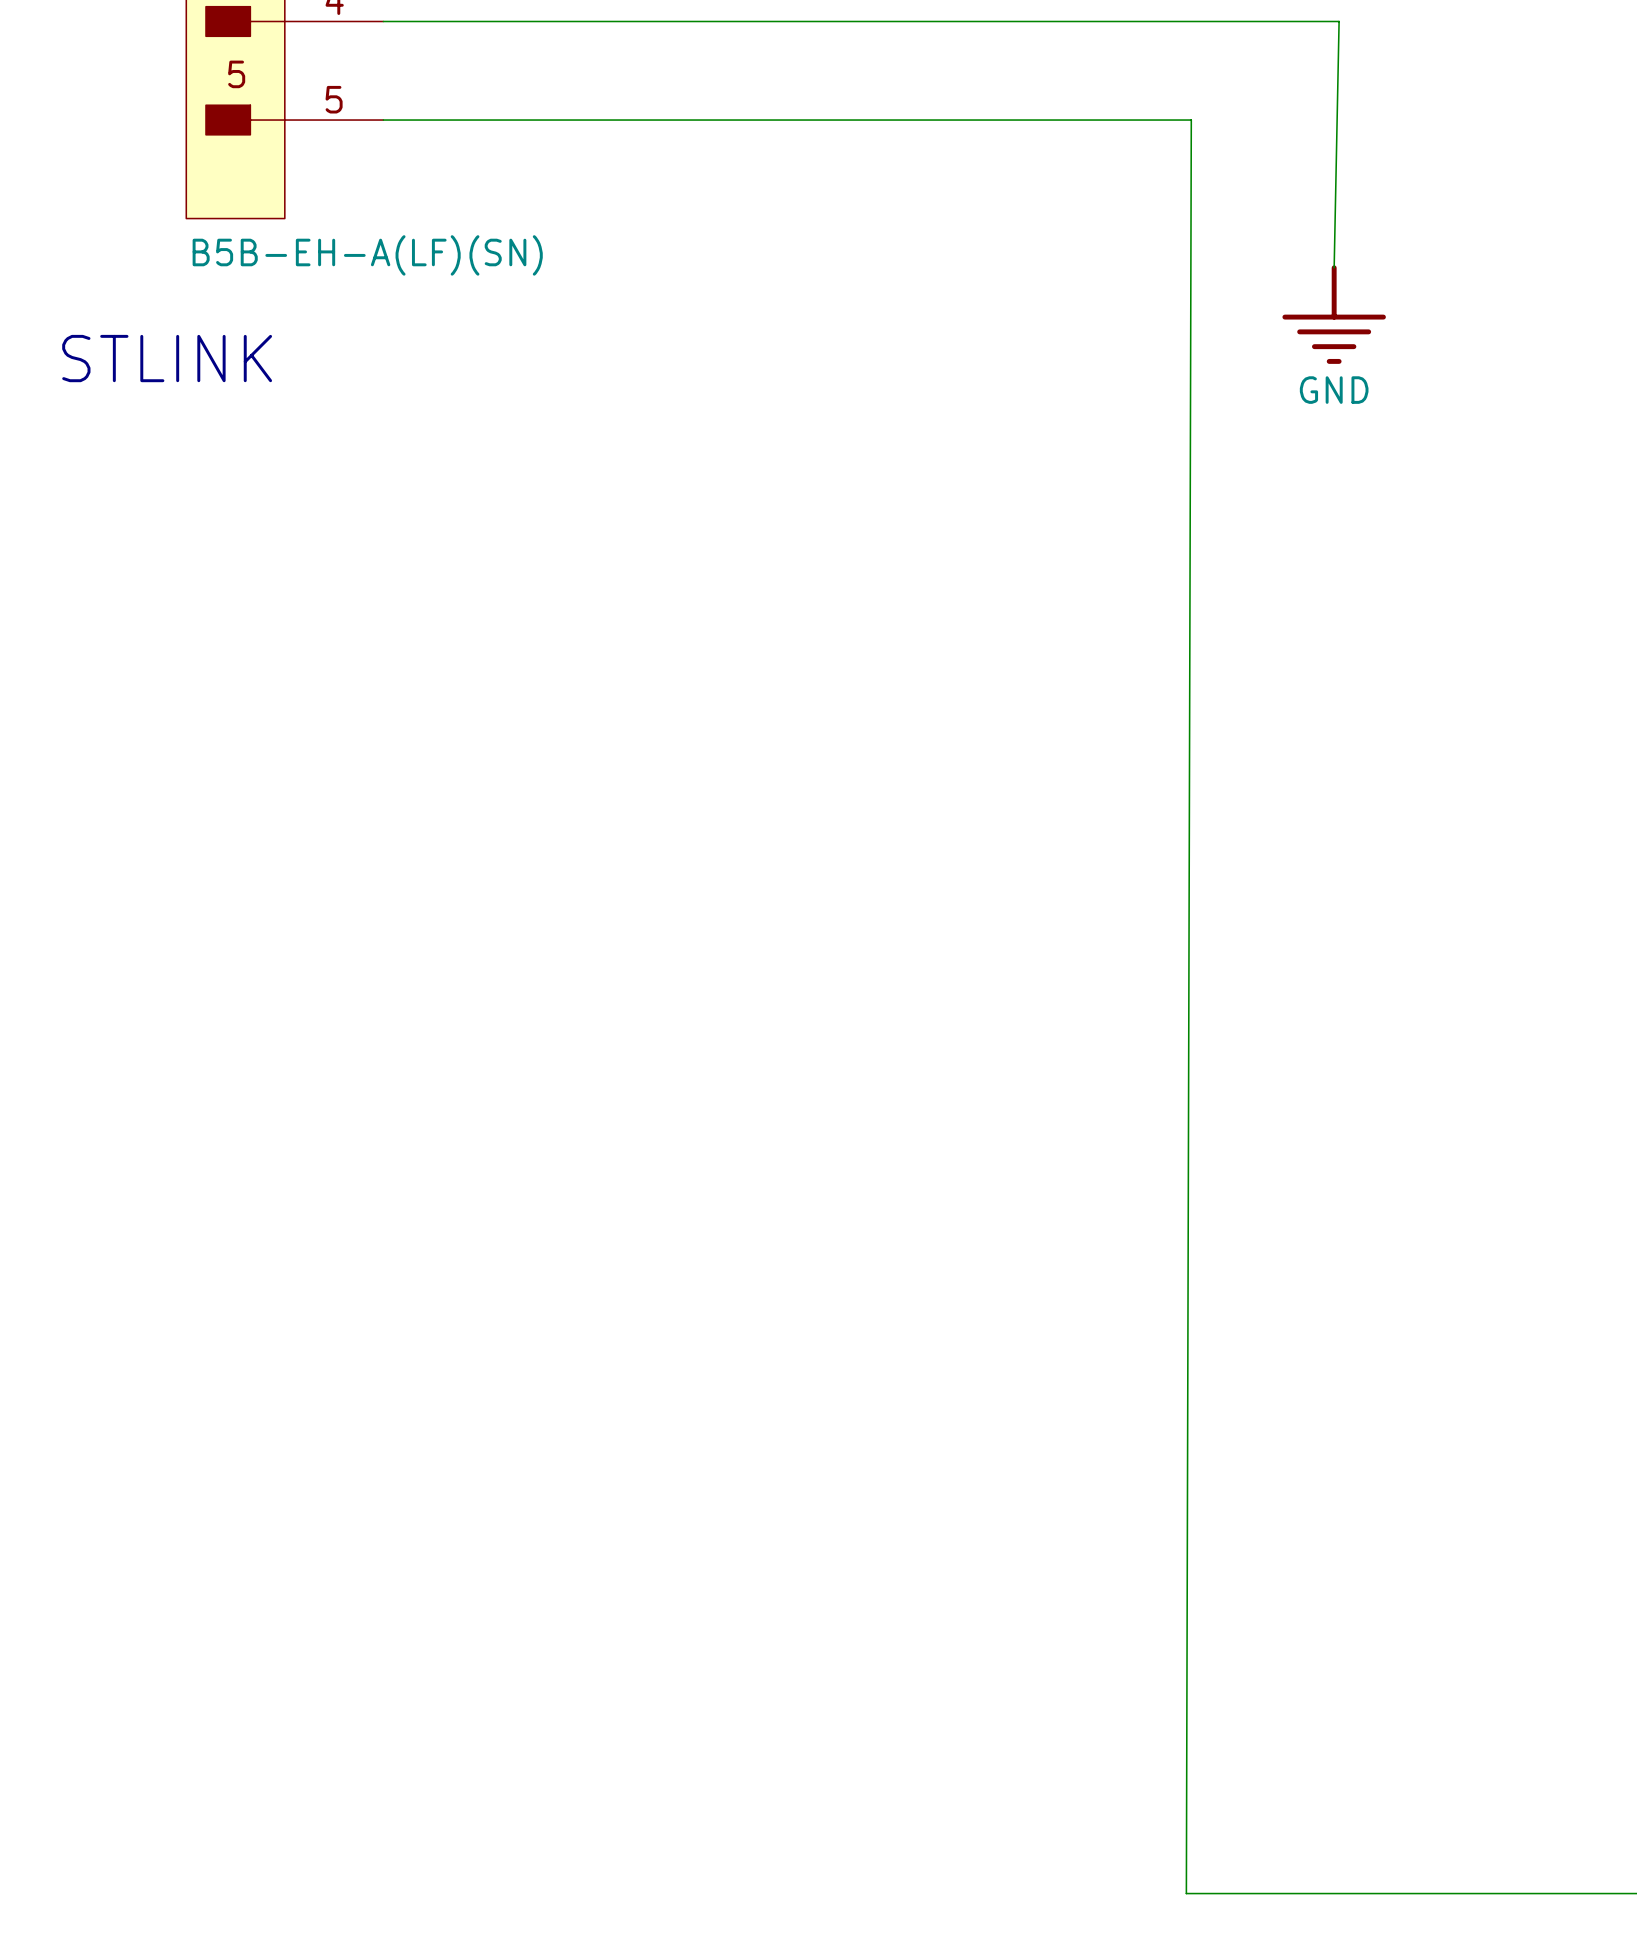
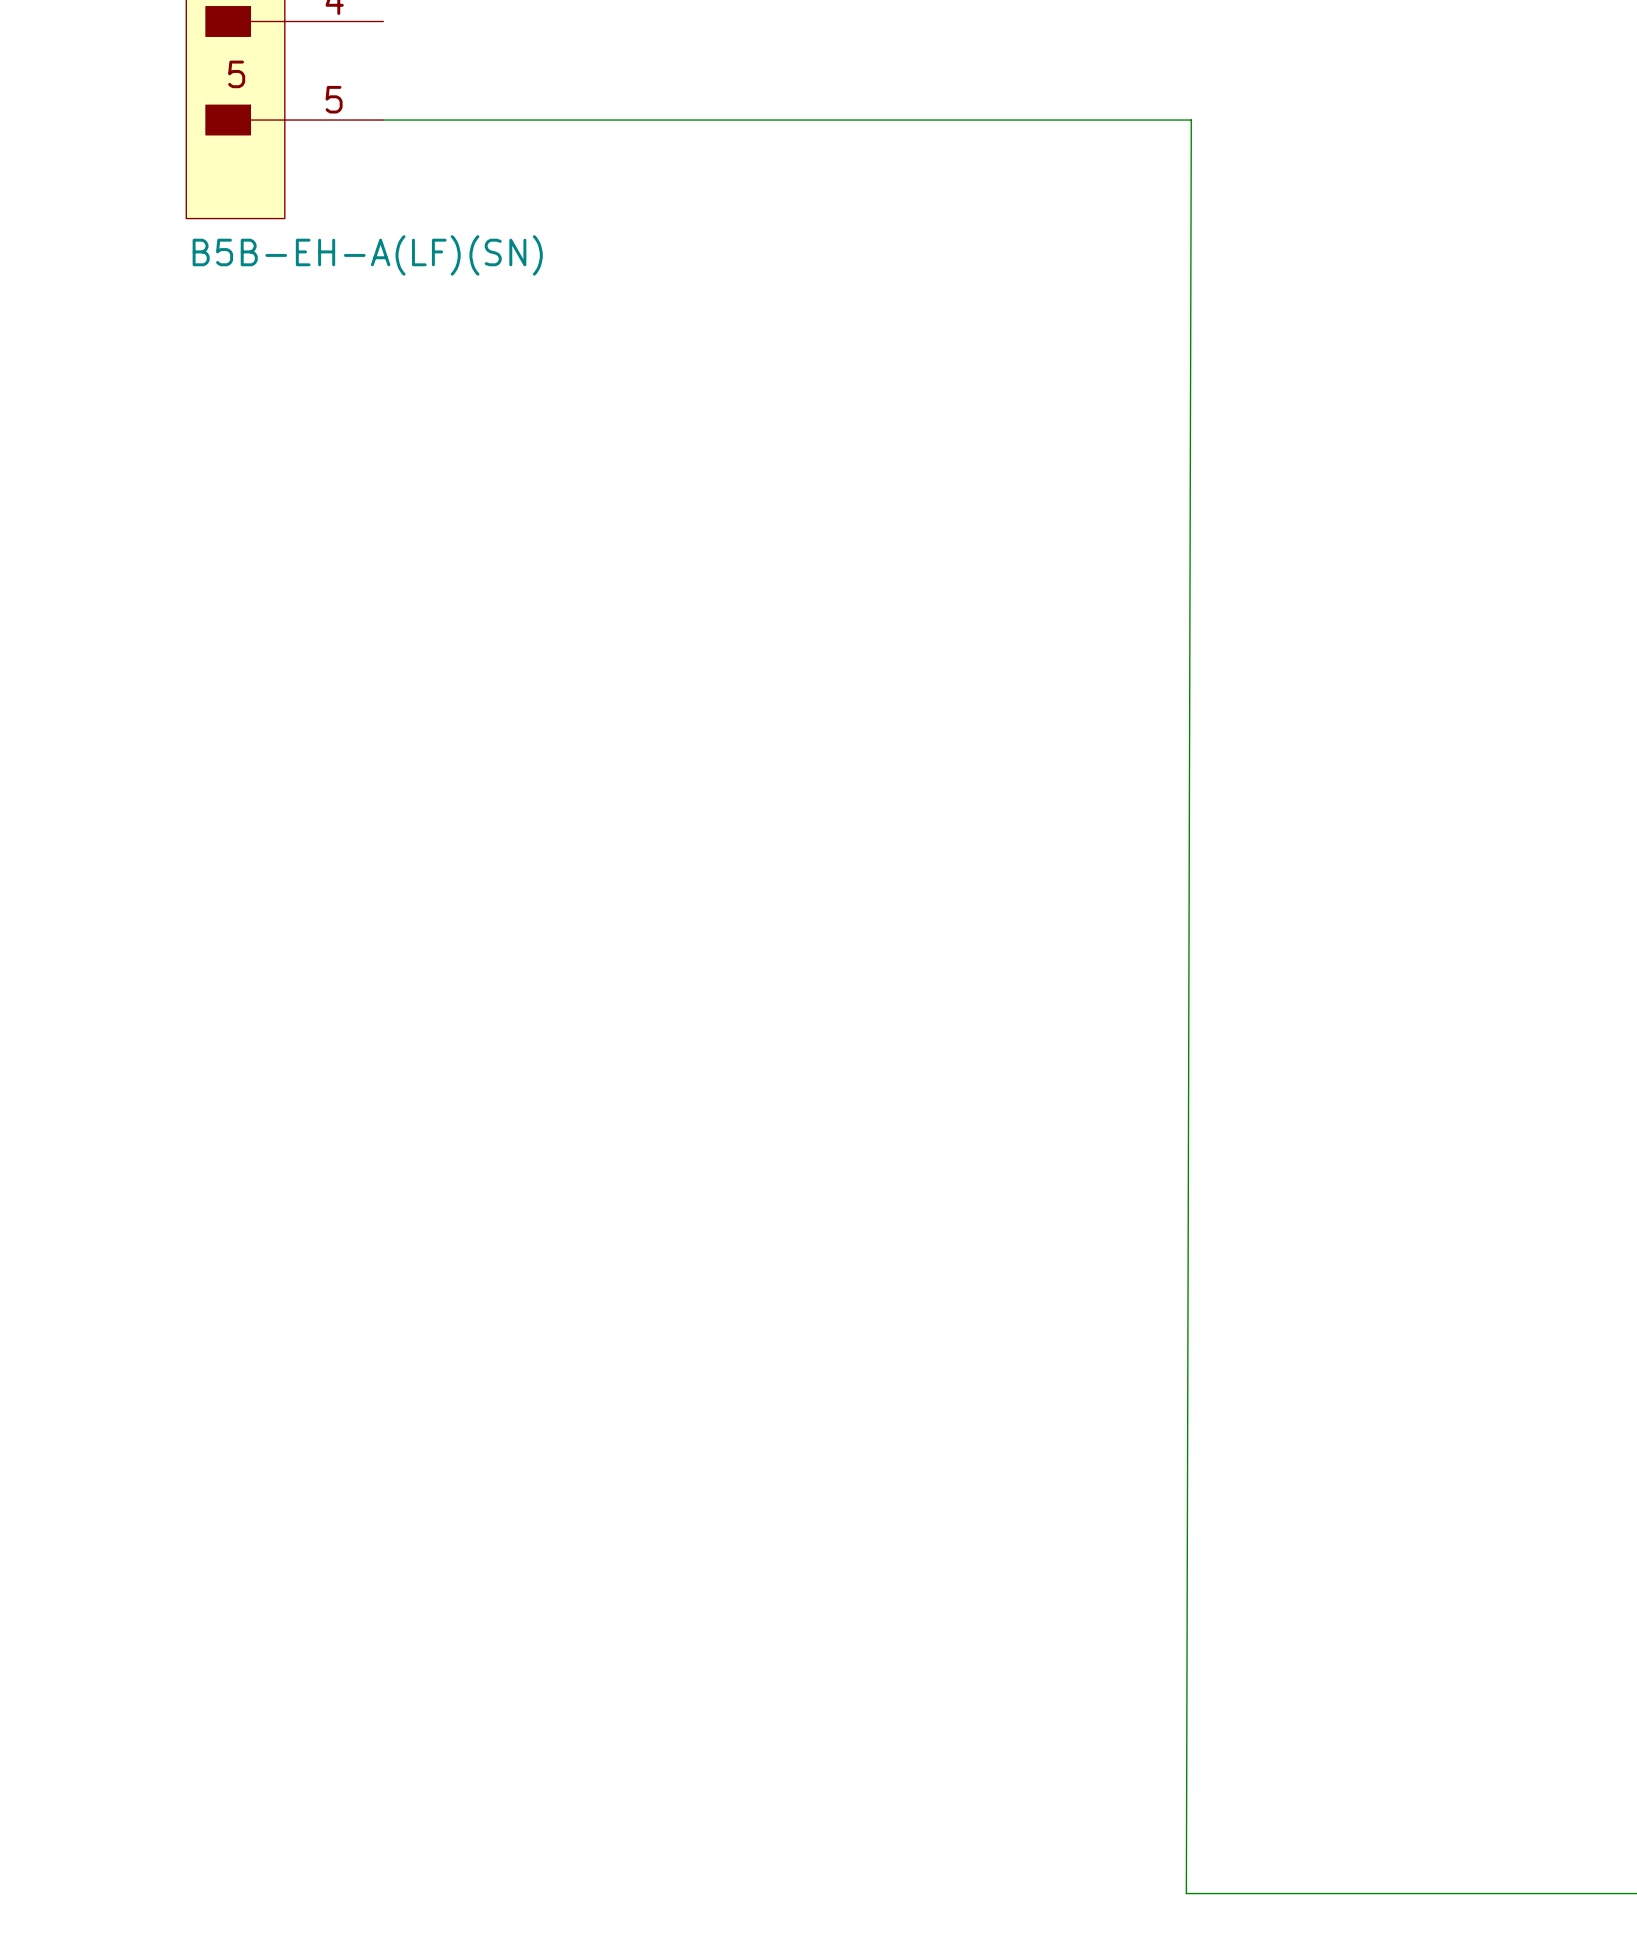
wire: (383, 21) (1339, 21) (1334, 267) -> none
power symbol: GND (1334, 314) -> none
text: STLINK (167, 358) -> none

